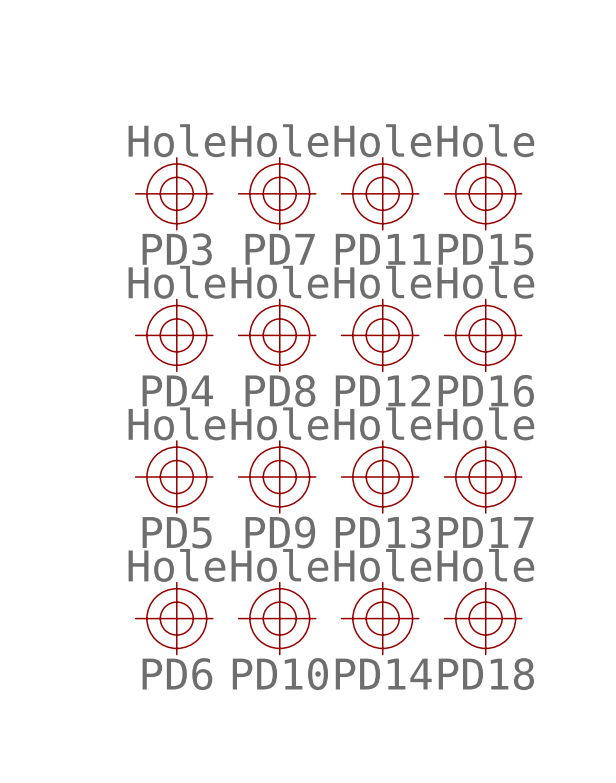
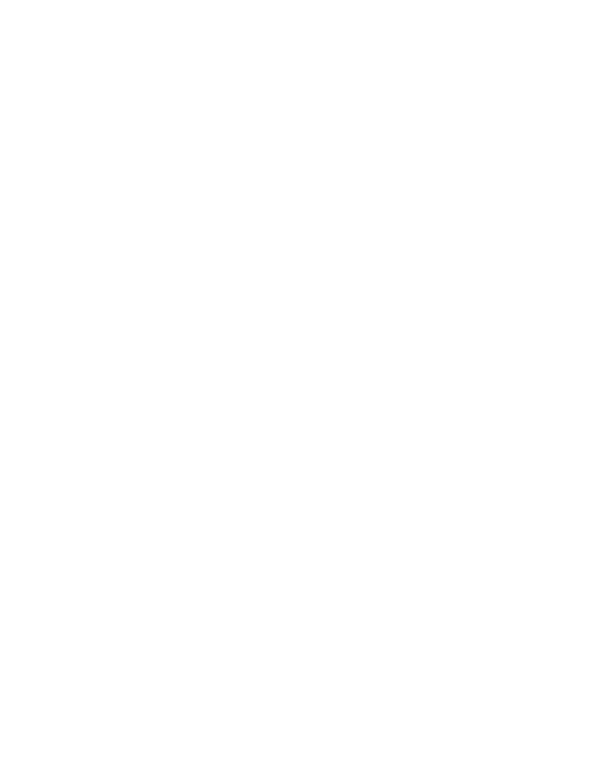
PD3: Hole (174, 193) -> none
PD7: Hole (277, 193) -> none
PD11: Hole (380, 193) -> none
PD15: Hole (483, 193) -> none
PD4: Hole (174, 335) -> none
PD8: Hole (277, 335) -> none
PD12: Hole (380, 335) -> none
PD16: Hole (483, 335) -> none
PD5: Hole (174, 477) -> none
PD9: Hole (277, 477) -> none
PD13: Hole (380, 477) -> none
PD17: Hole (483, 477) -> none
PD6: Hole (174, 618) -> none
PD10: Hole (277, 618) -> none
PD14: Hole (380, 618) -> none
PD18: Hole (483, 618) -> none

